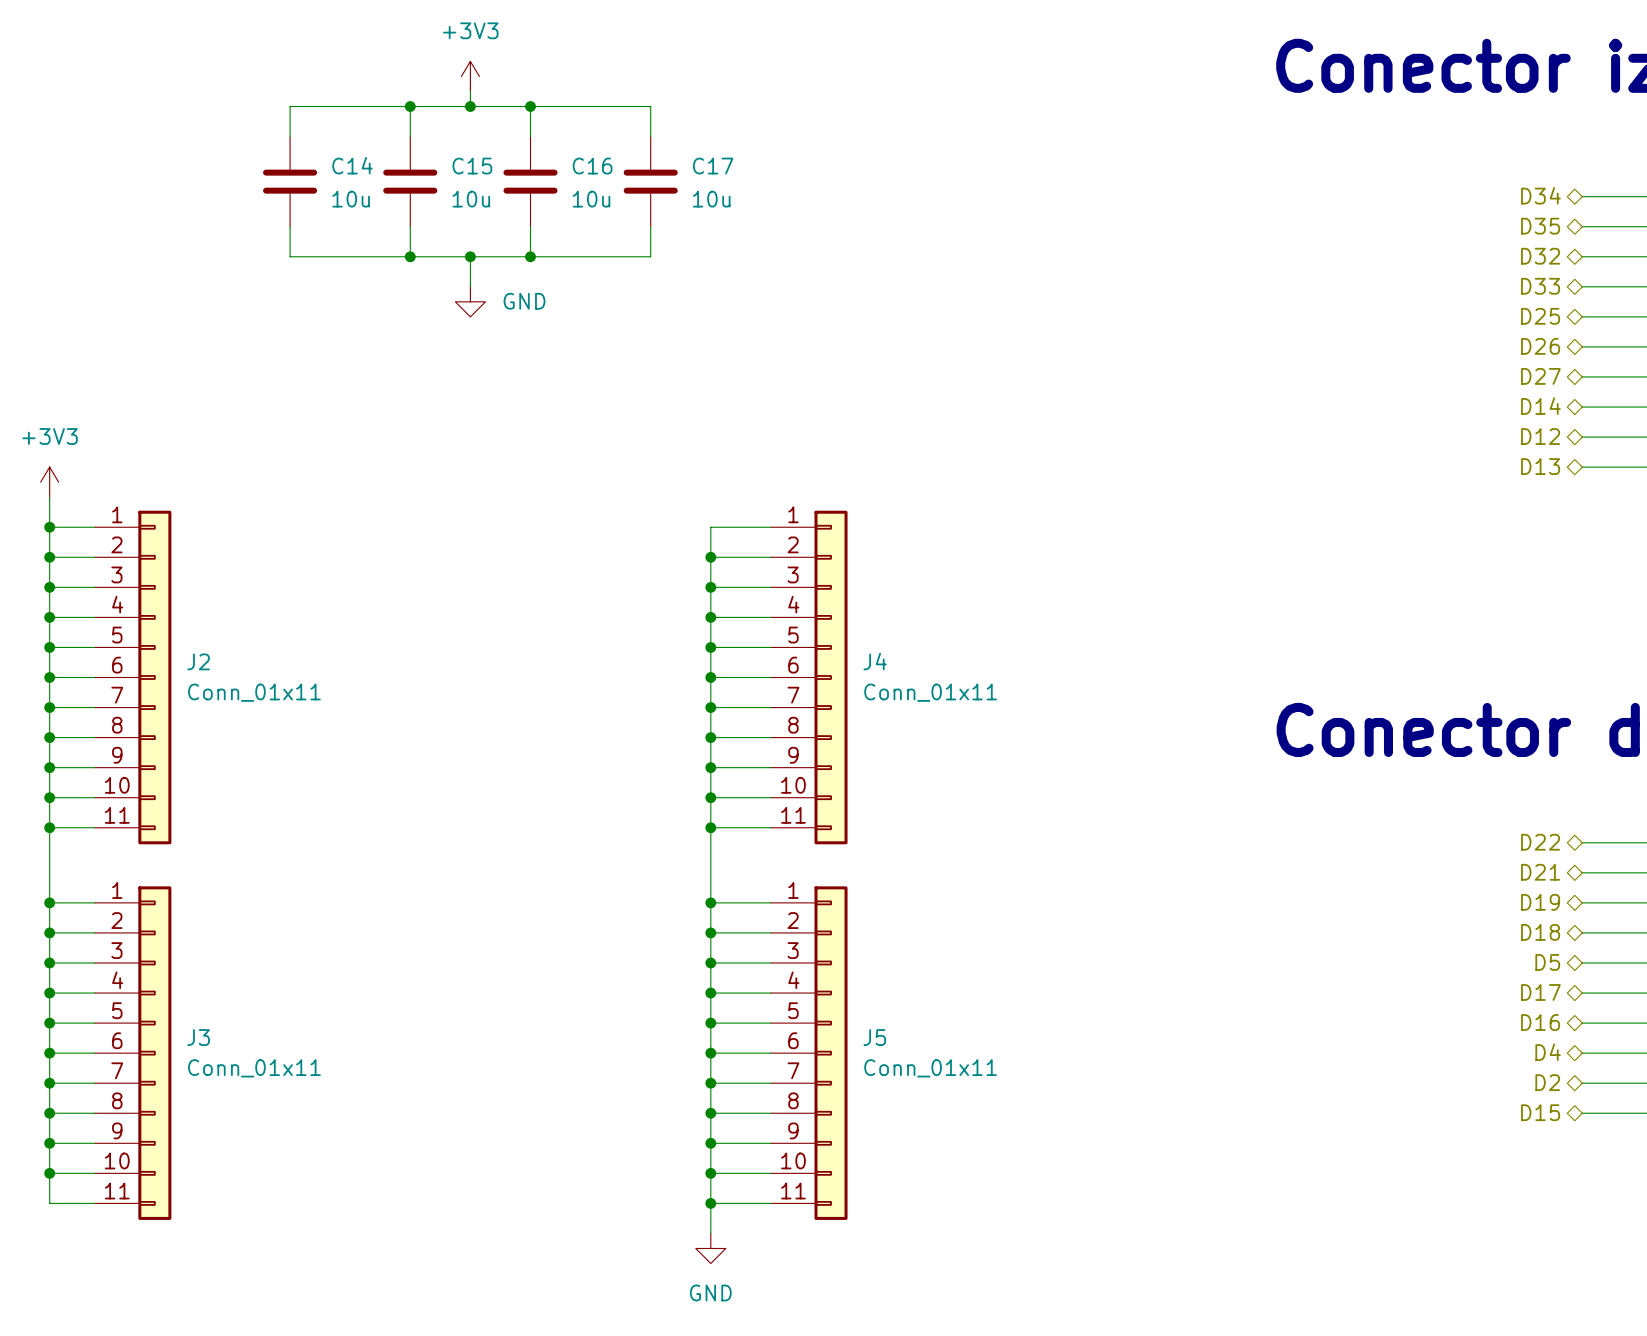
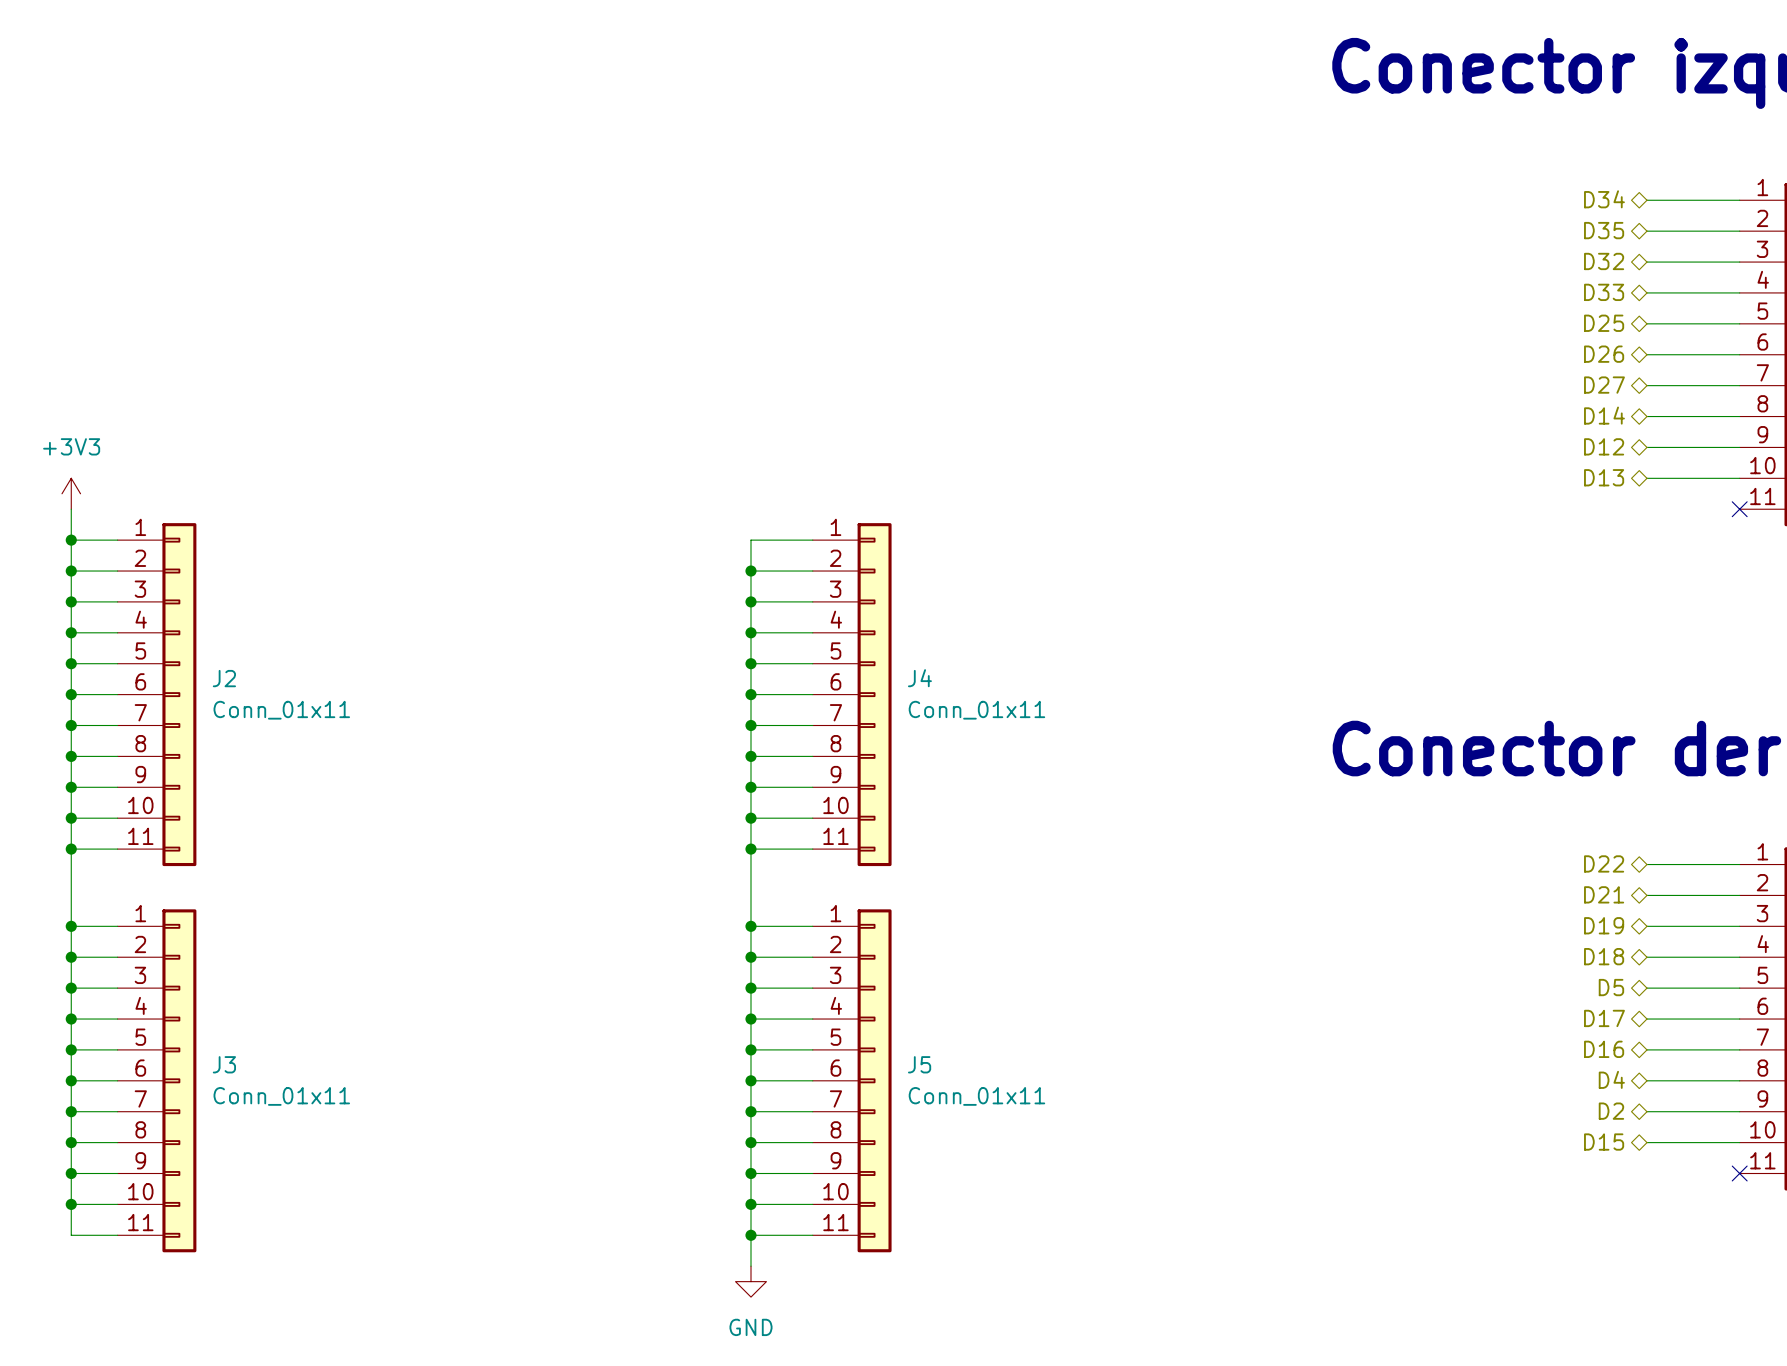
power symbol: +3V3 (470, 76) -> none
wire: (470, 91) (470, 106) -> none
wire: (410, 106) (410, 136) -> none
junction: (410, 106) -> none
junction: (470, 106) -> none
wire: (530, 106) (530, 136) -> none
junction: (530, 106) -> none
wire: (290, 136) (290, 106) (650, 106) (650, 136) -> none
C14: 10u (290, 181) -> none
C15: 10u (410, 181) -> none
C16: 10u (530, 181) -> none
C17: 10u (650, 181) -> none
wire: (290, 226) (290, 256) (650, 256) (650, 226) -> none
wire: (410, 226) (410, 256) -> none
wire: (530, 226) (530, 256) -> none
junction: (410, 256) -> none
wire: (470, 256) (470, 286) -> none
junction: (470, 256) -> none
junction: (530, 256) -> none
power symbol: GND (470, 301) -> none

